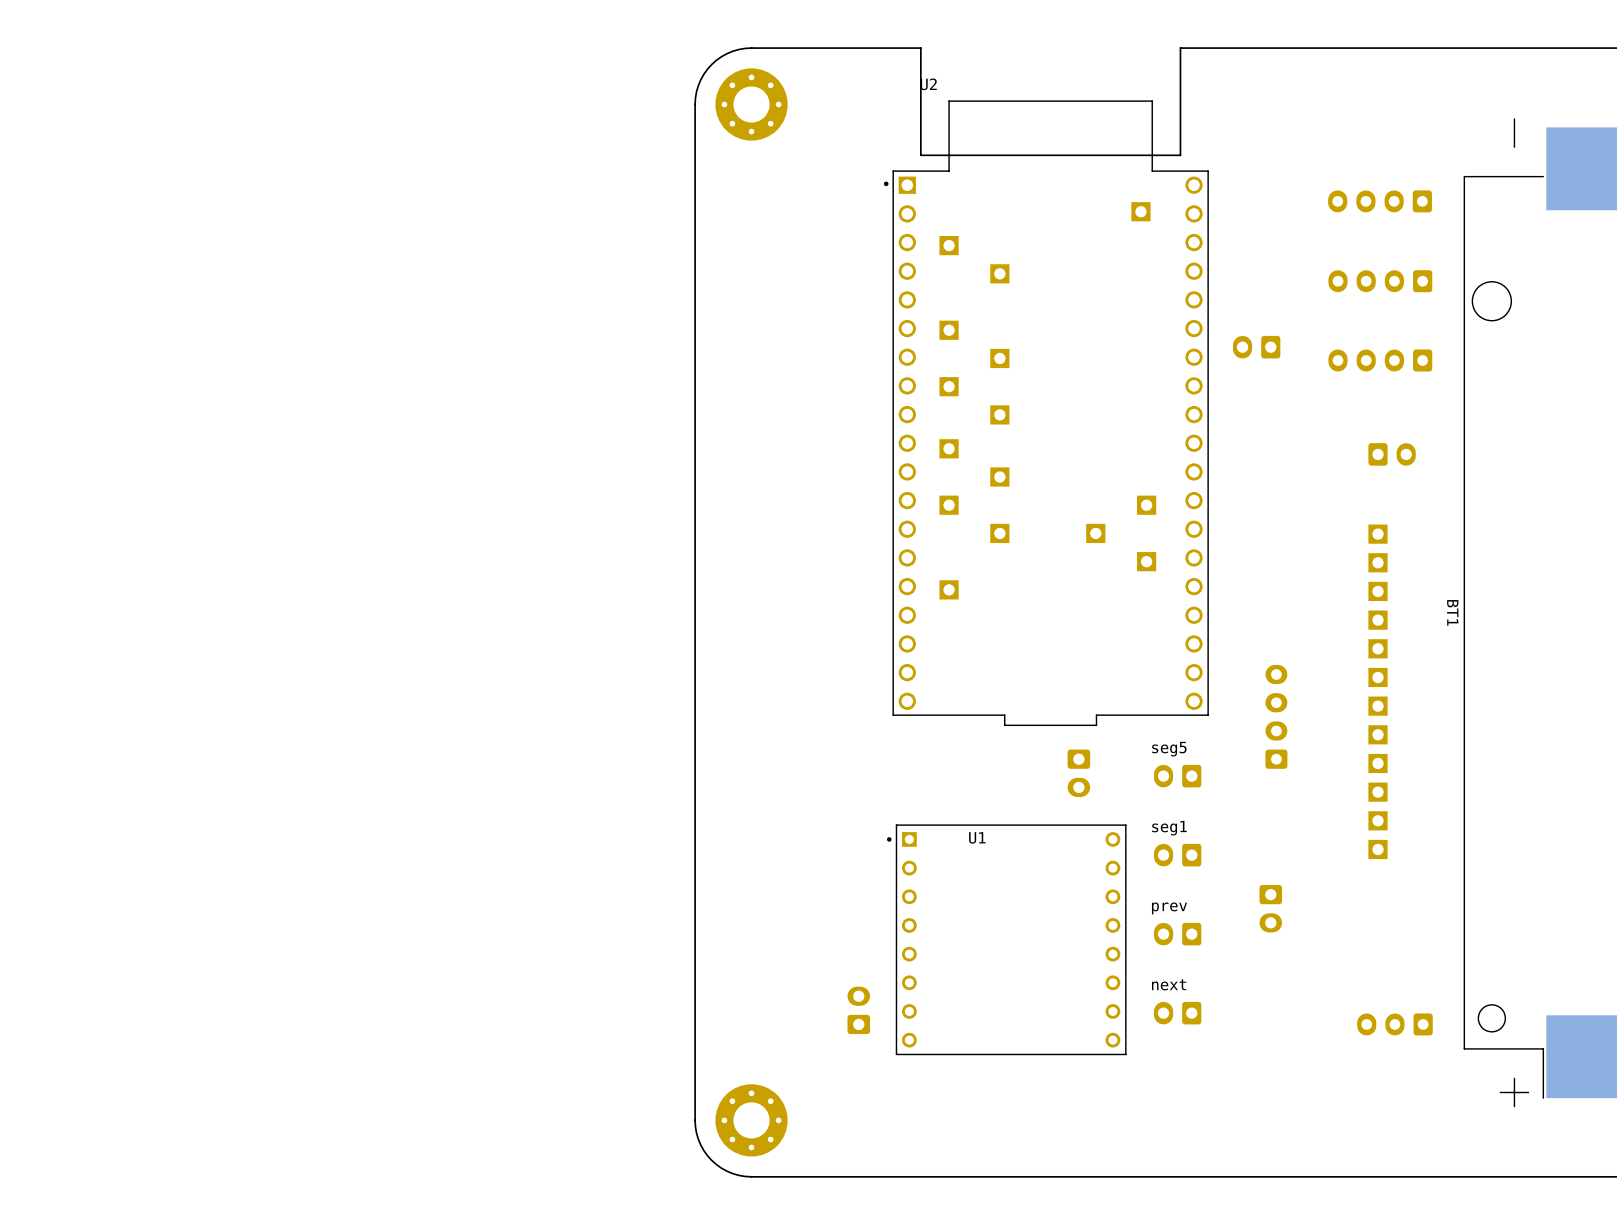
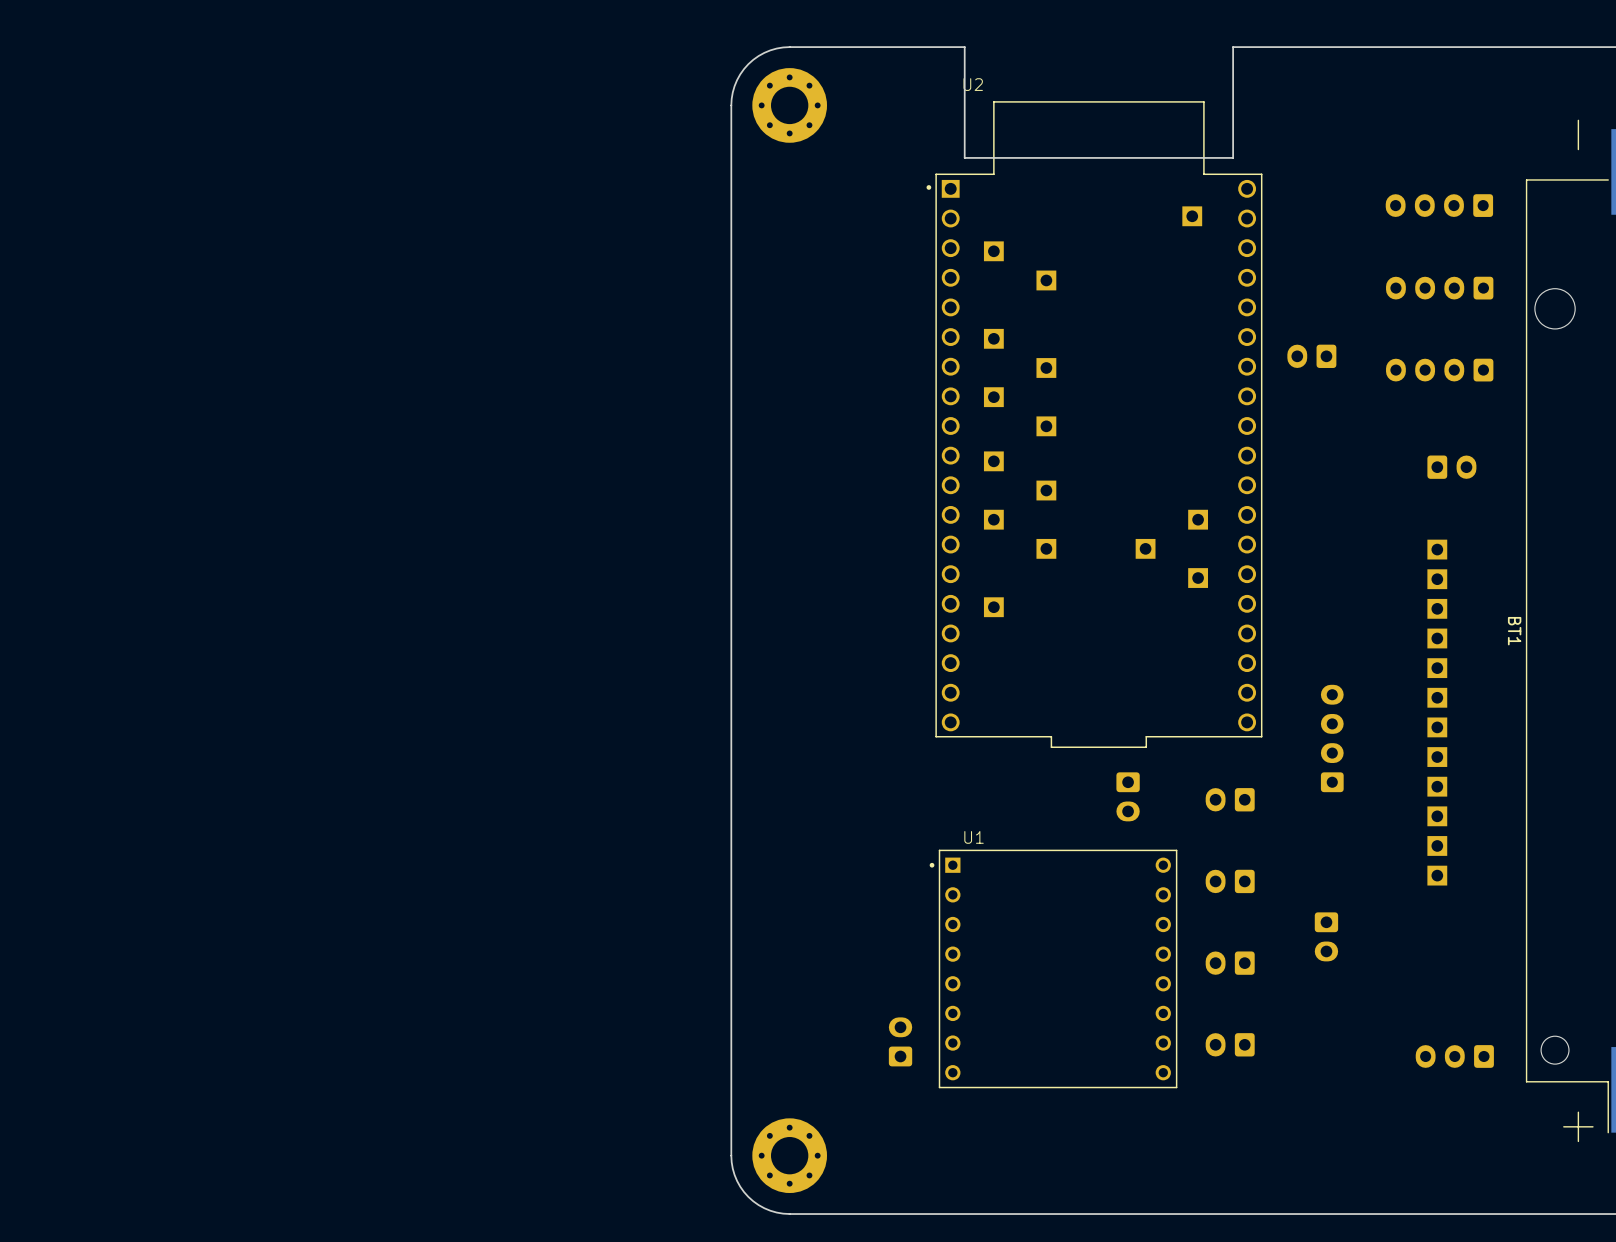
text: seg5 (1169, 749) -> none
text: seg1 (1169, 828) -> none
U1 name position: U1 (977, 837) -> U1 (974, 837)
text: prev (1169, 908) -> none
text: next (1169, 984) -> none

